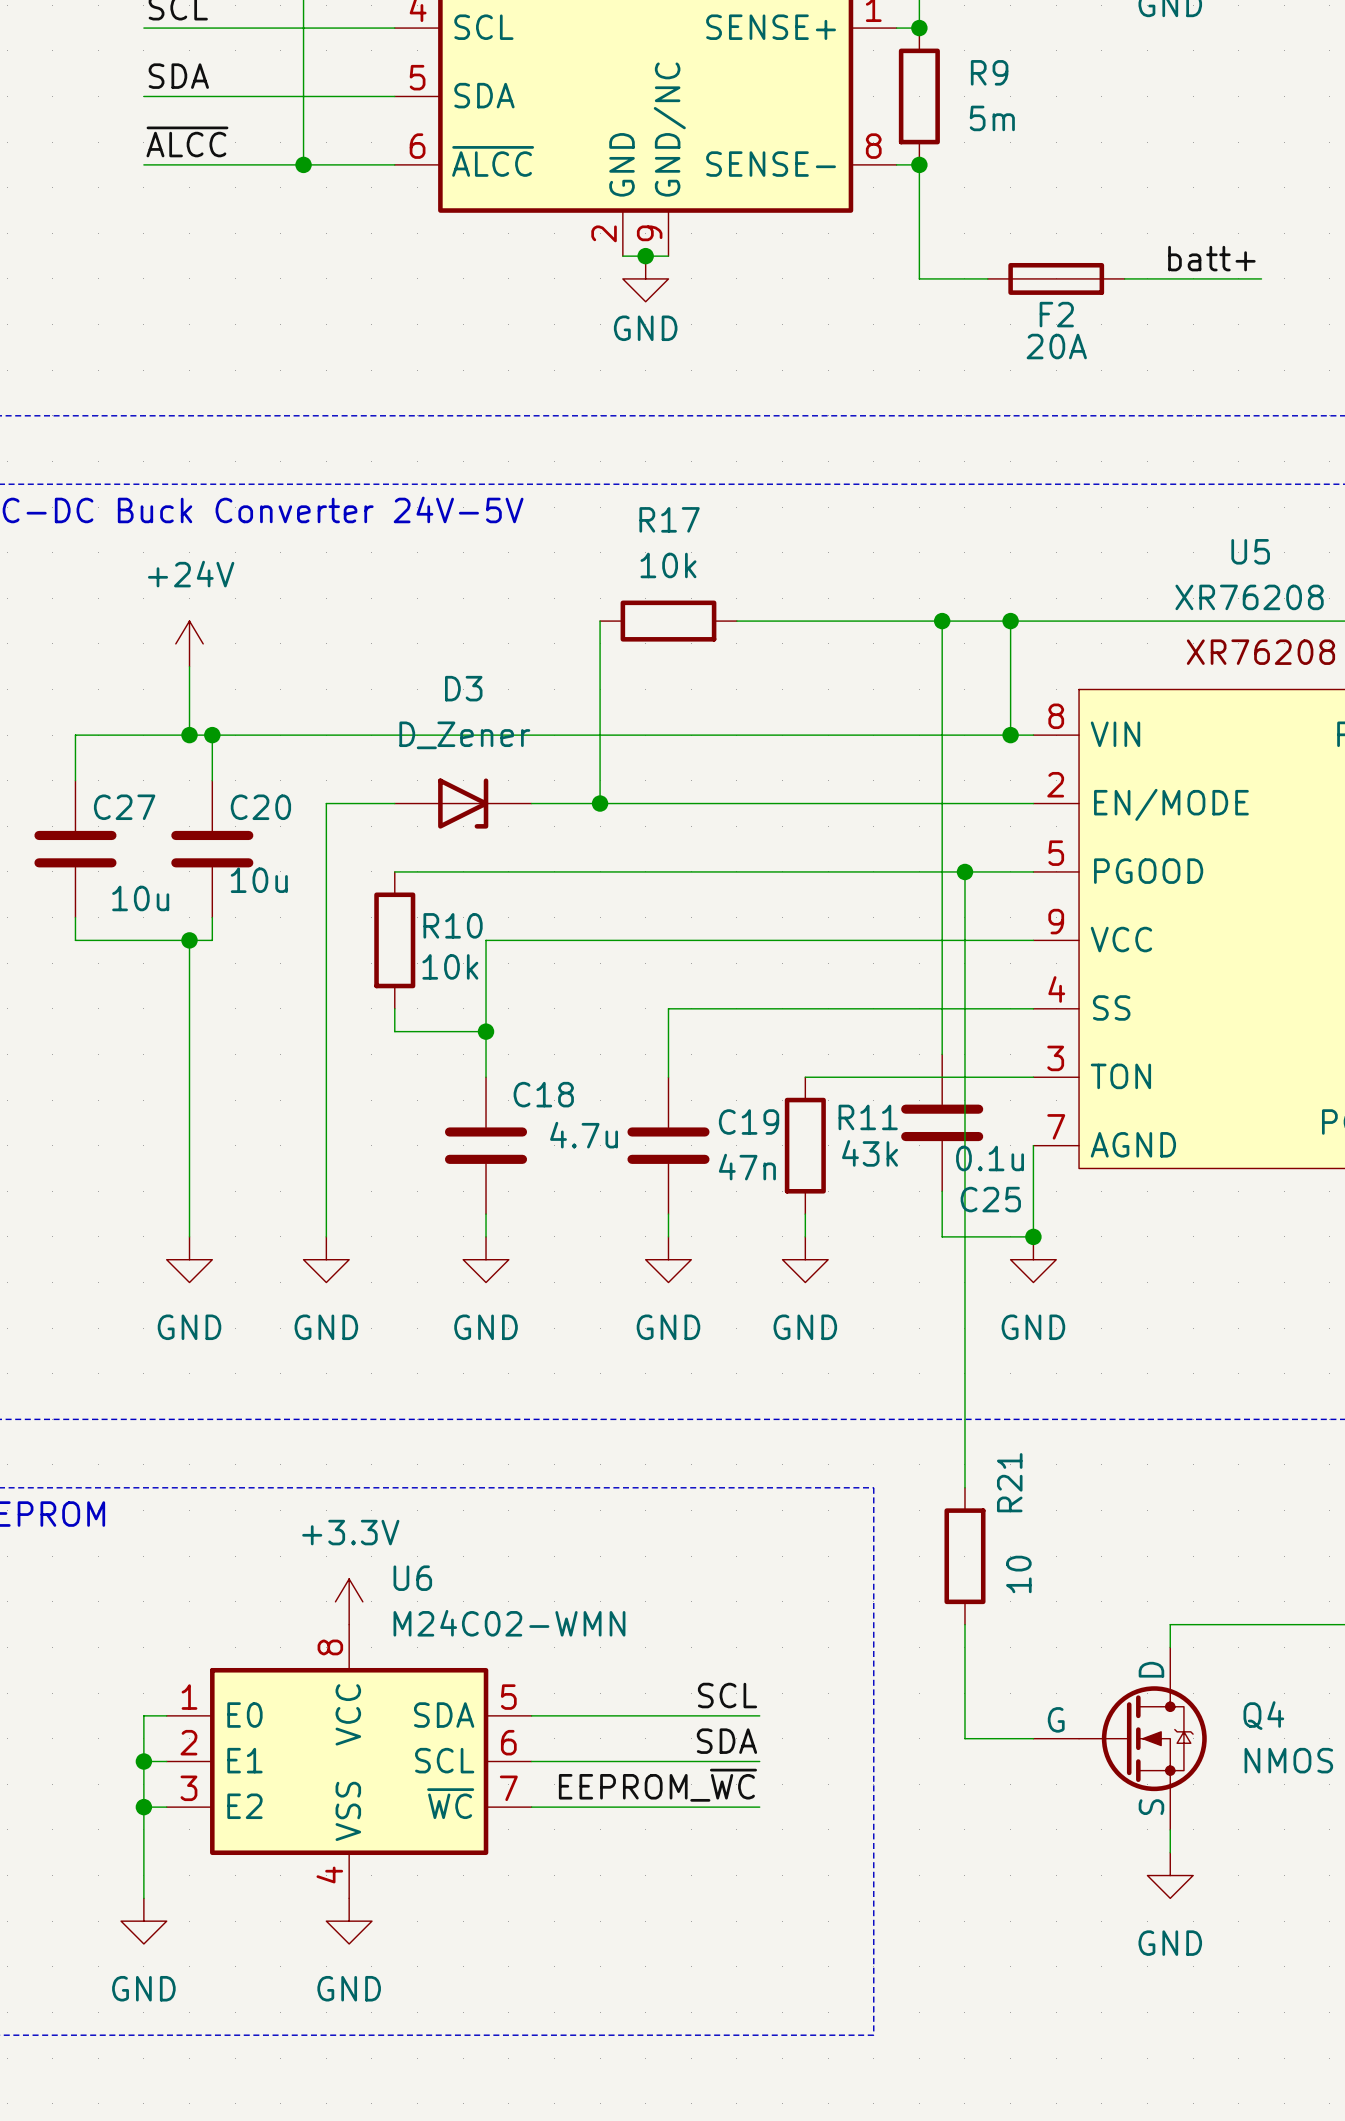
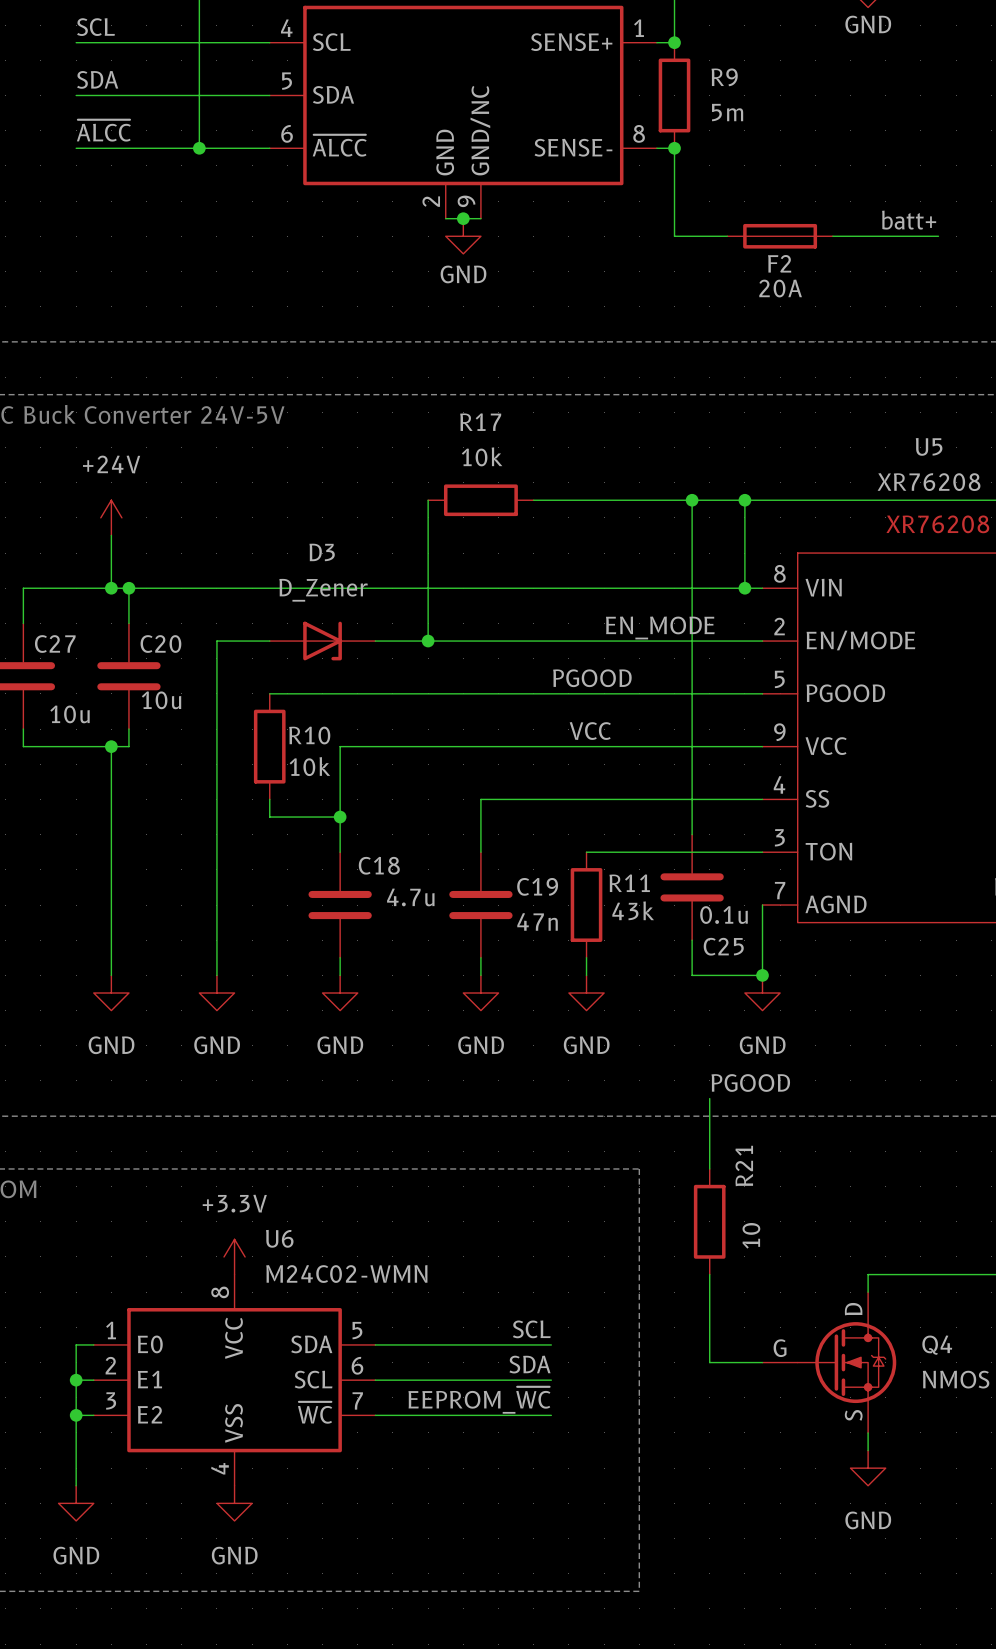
label: none -> EN_MODE (660, 627)
label: none -> PGOOD (592, 678)
wire: (964, 871) (964, 1396) -> none
junction: (964, 871) -> none
label: none -> VCC (590, 731)
label: none -> PGOOD (750, 1083)

